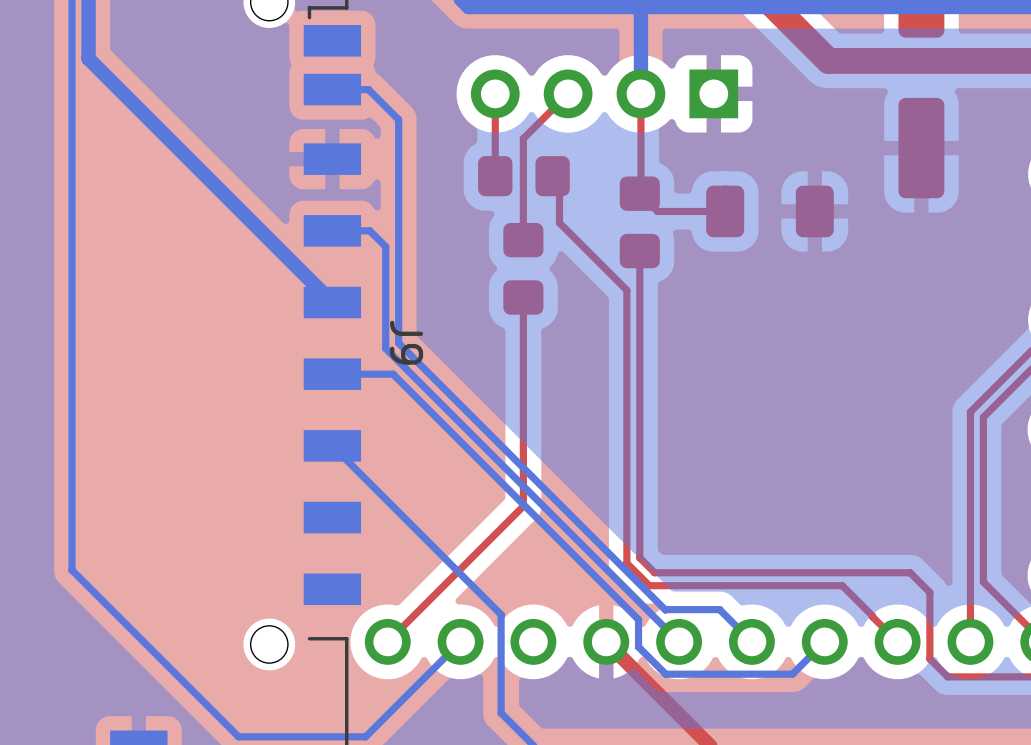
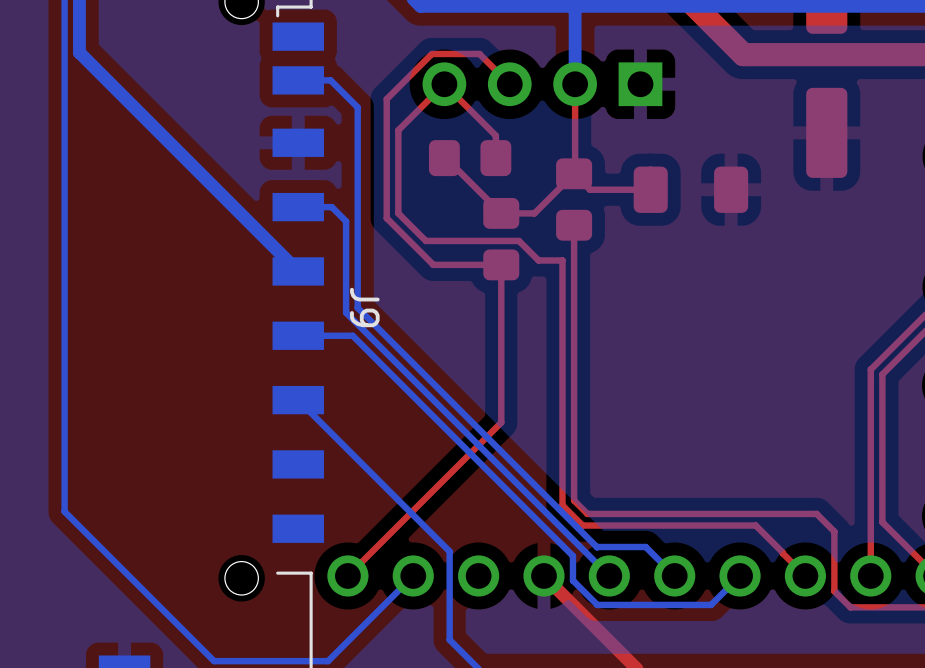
top track: (495, 93) (495, 176) -> (574, 173) (534, 213) (501, 213) (444, 158)
top track: (568, 93) (523, 138) (523, 240) -> none
top track: (559, 183) (559, 222) (626, 290) -> (495, 158) (495, 135) (444, 84) (398, 130) (398, 213) (425, 240) (519, 240) (538, 260) (562, 260)
part position: (523, 268) -> (501, 239)
top track: (523, 297) (523, 506) -> (509, 84) (479, 53) (431, 53) (386, 99) (386, 218) (433, 264) (501, 264) (501, 422) (469, 454)

